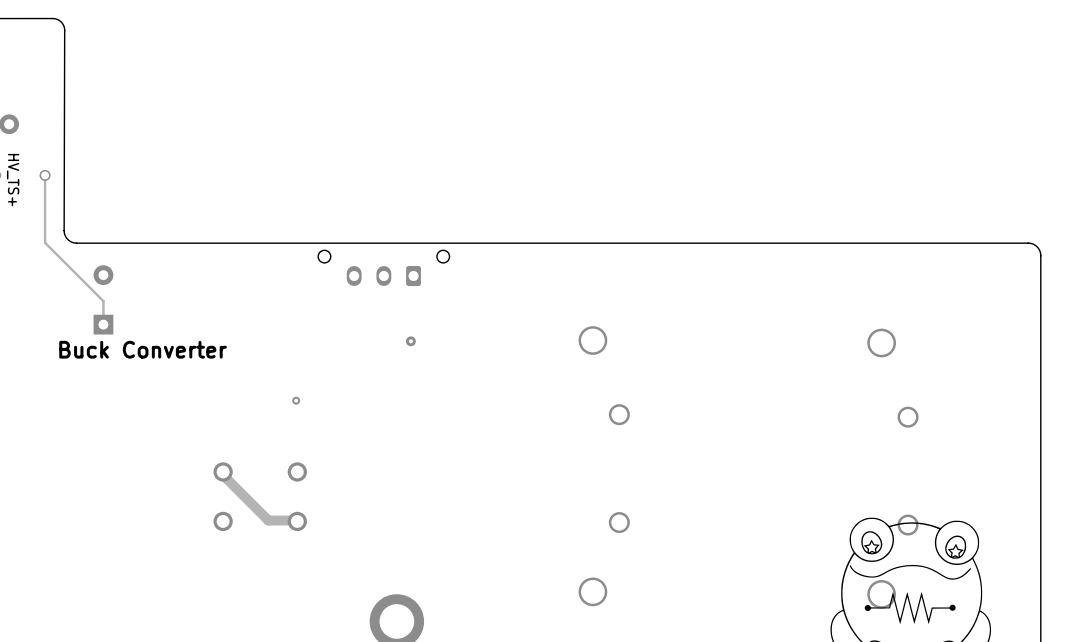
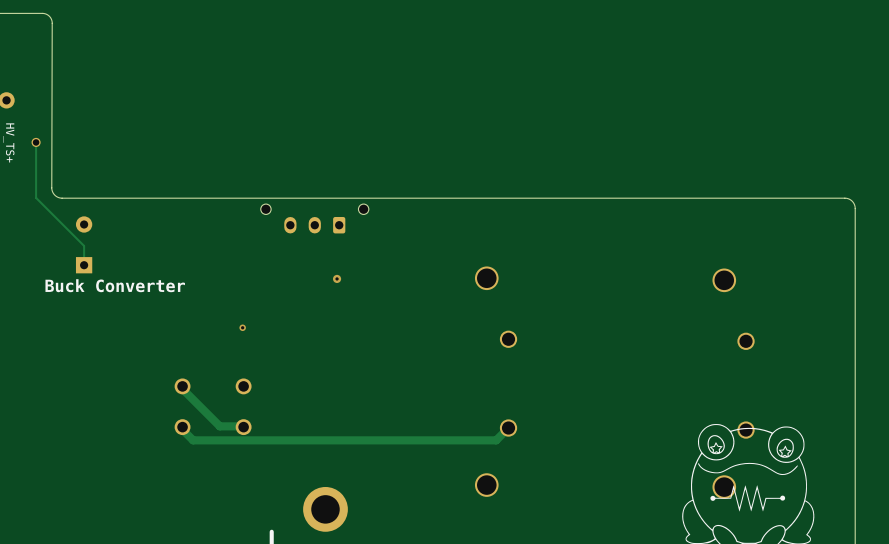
track: none -> (179, 426) (193, 440) (496, 440) (508, 428)

